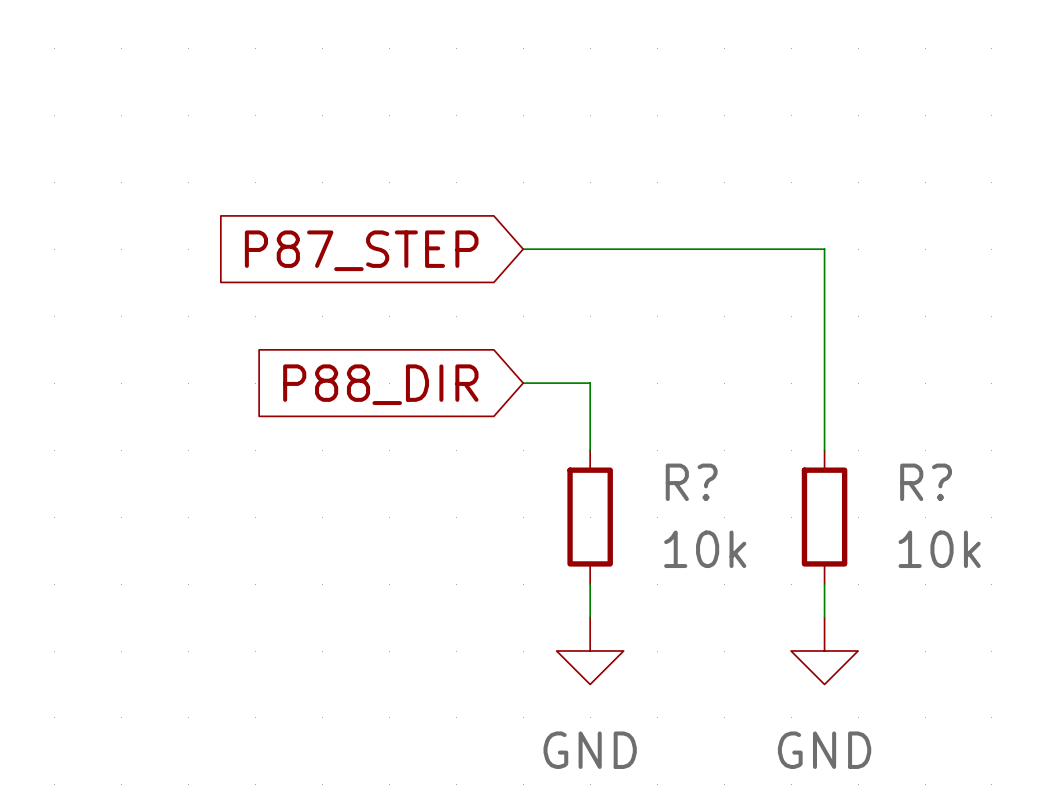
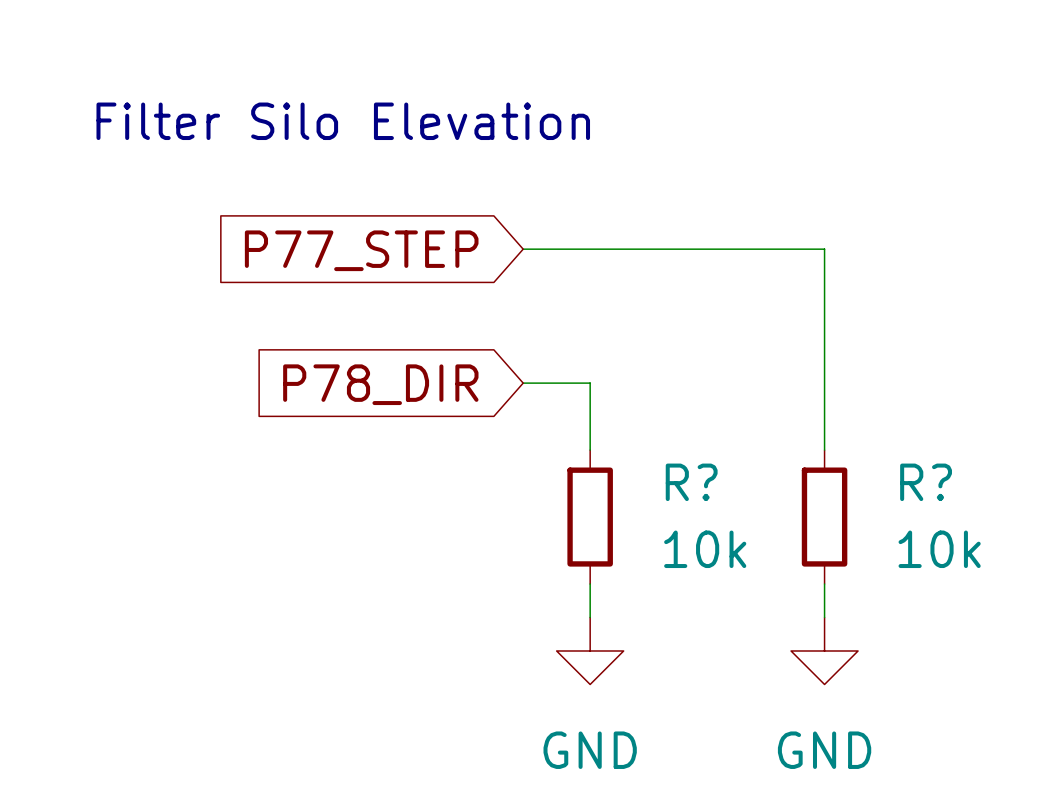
text: none -> Filter Silo Elevation (343, 121)
global label: P87_STEP (361, 250) -> P77_STEP (361, 250)
global label: P88_DIR (380, 384) -> P78_DIR (380, 384)

